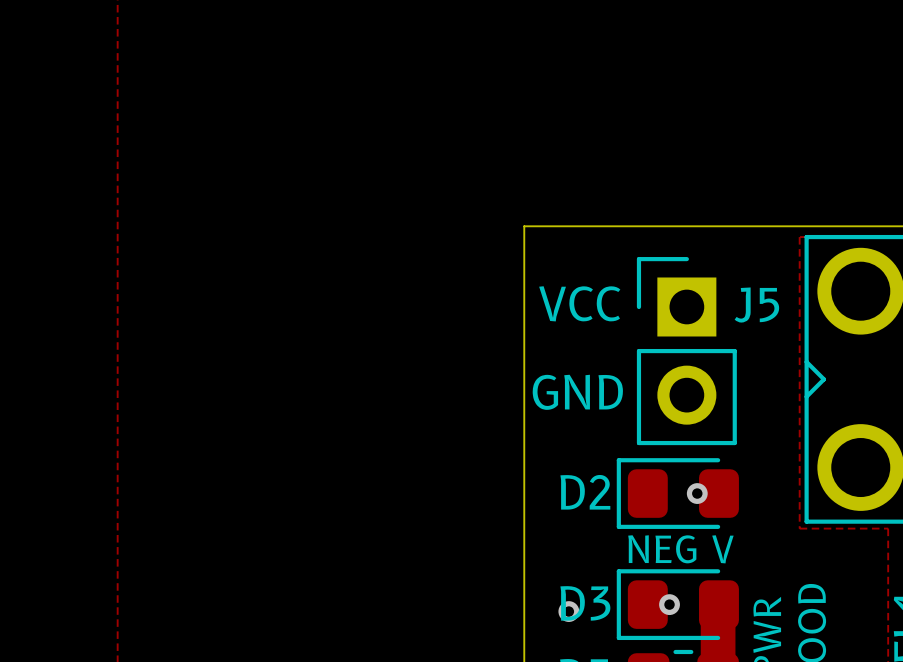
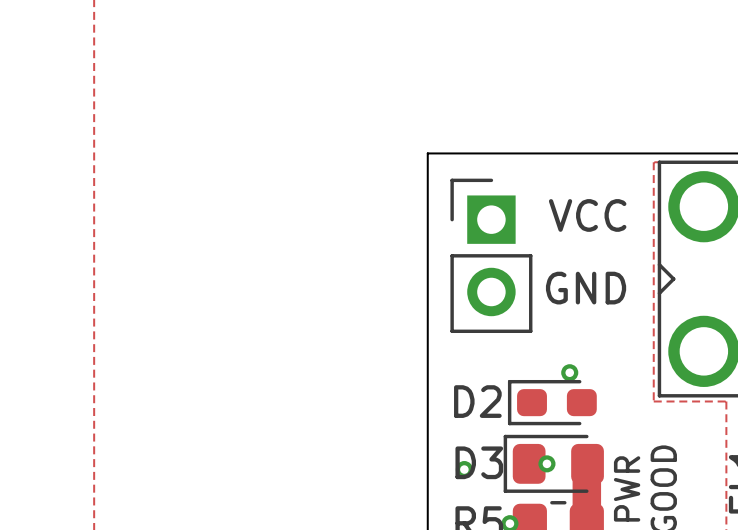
text position: VCC (579, 303) -> VCC (587, 215)
part: none -> (491, 255)
J5: (686, 351) -> none
text position: GND (577, 392) -> GND (586, 288)
D2 footprint: [616, 458, 739, 529] -> [507, 379, 597, 426]
text: NEG V (680, 549) -> none

